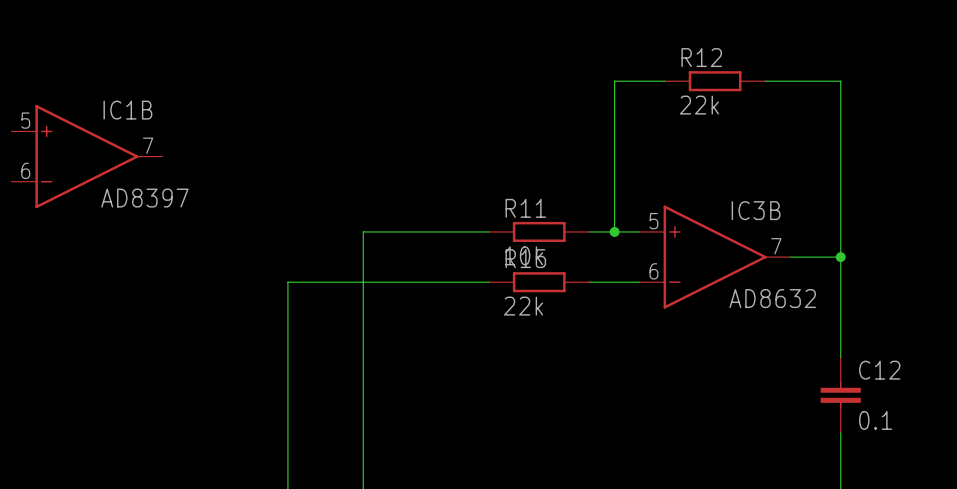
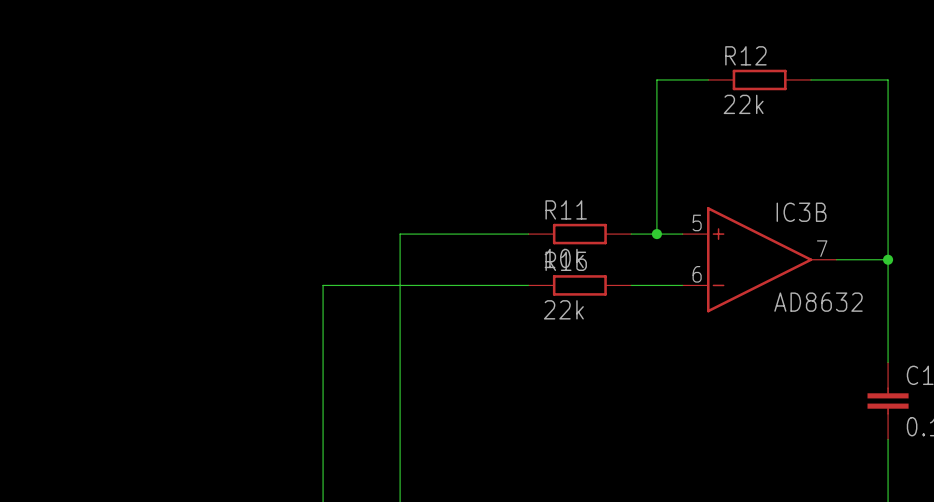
IC1B: AD8397 (86, 156) -> none

